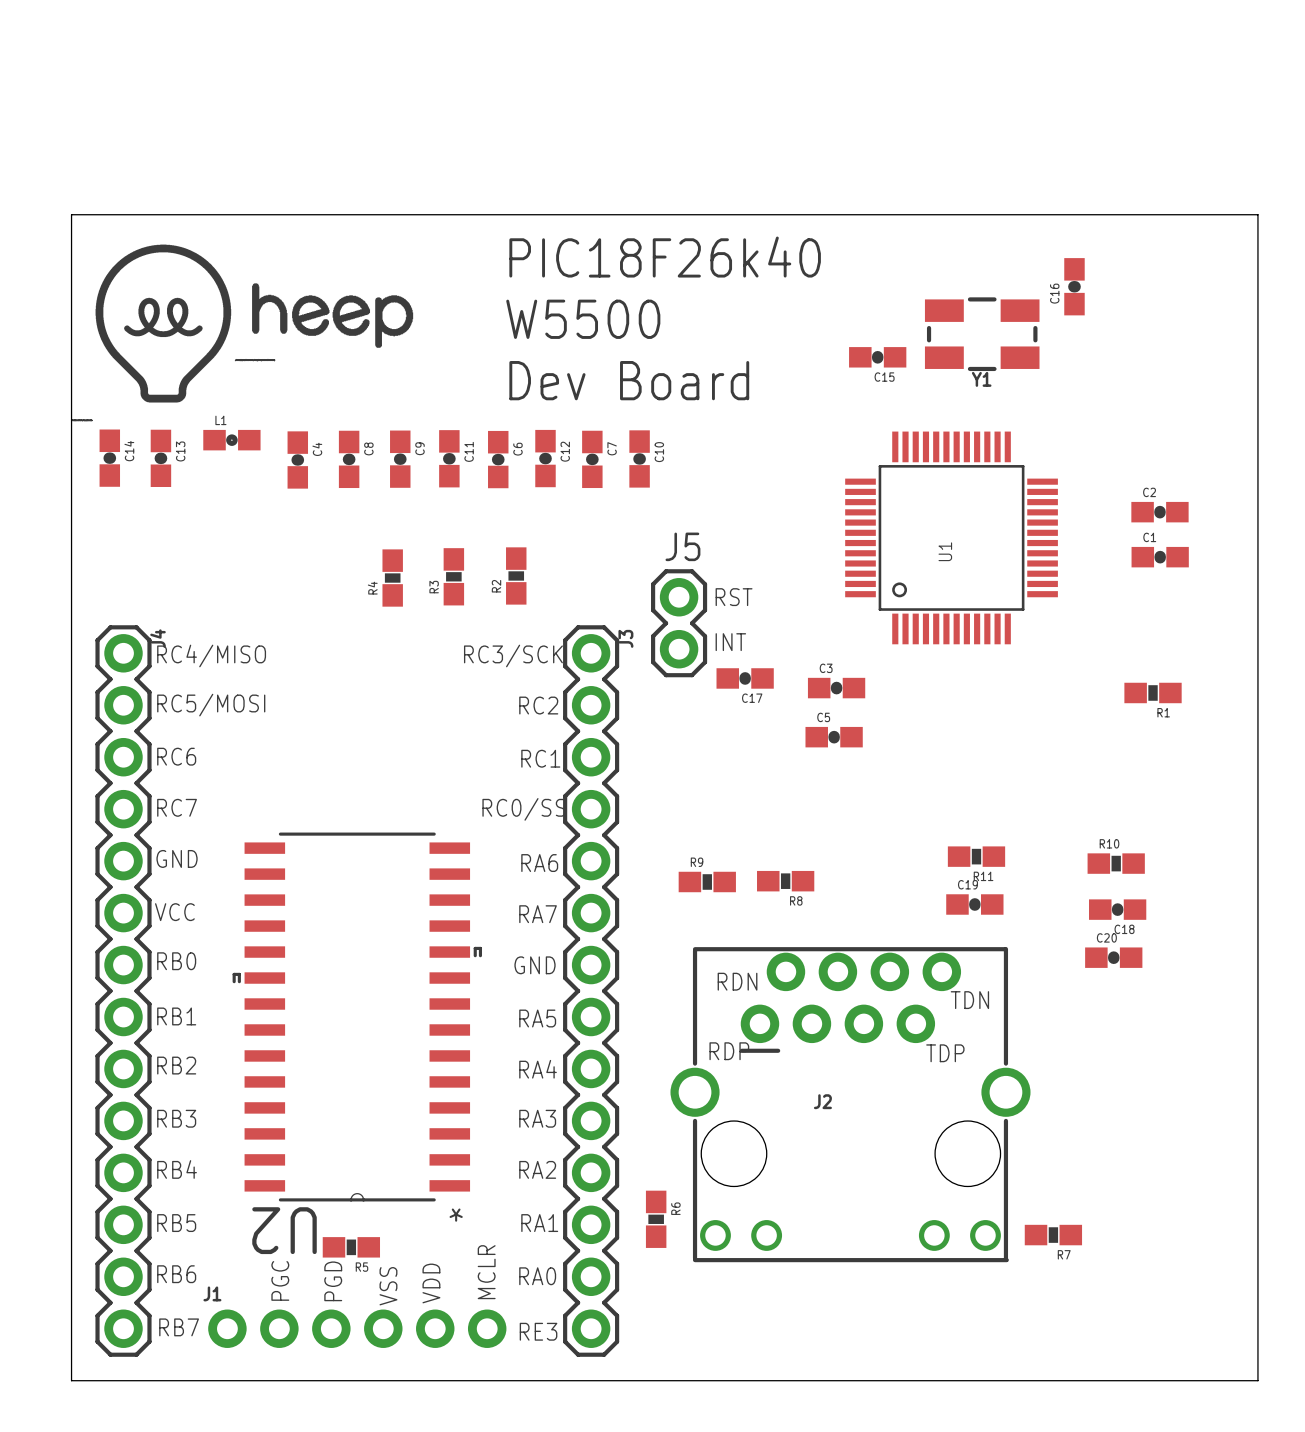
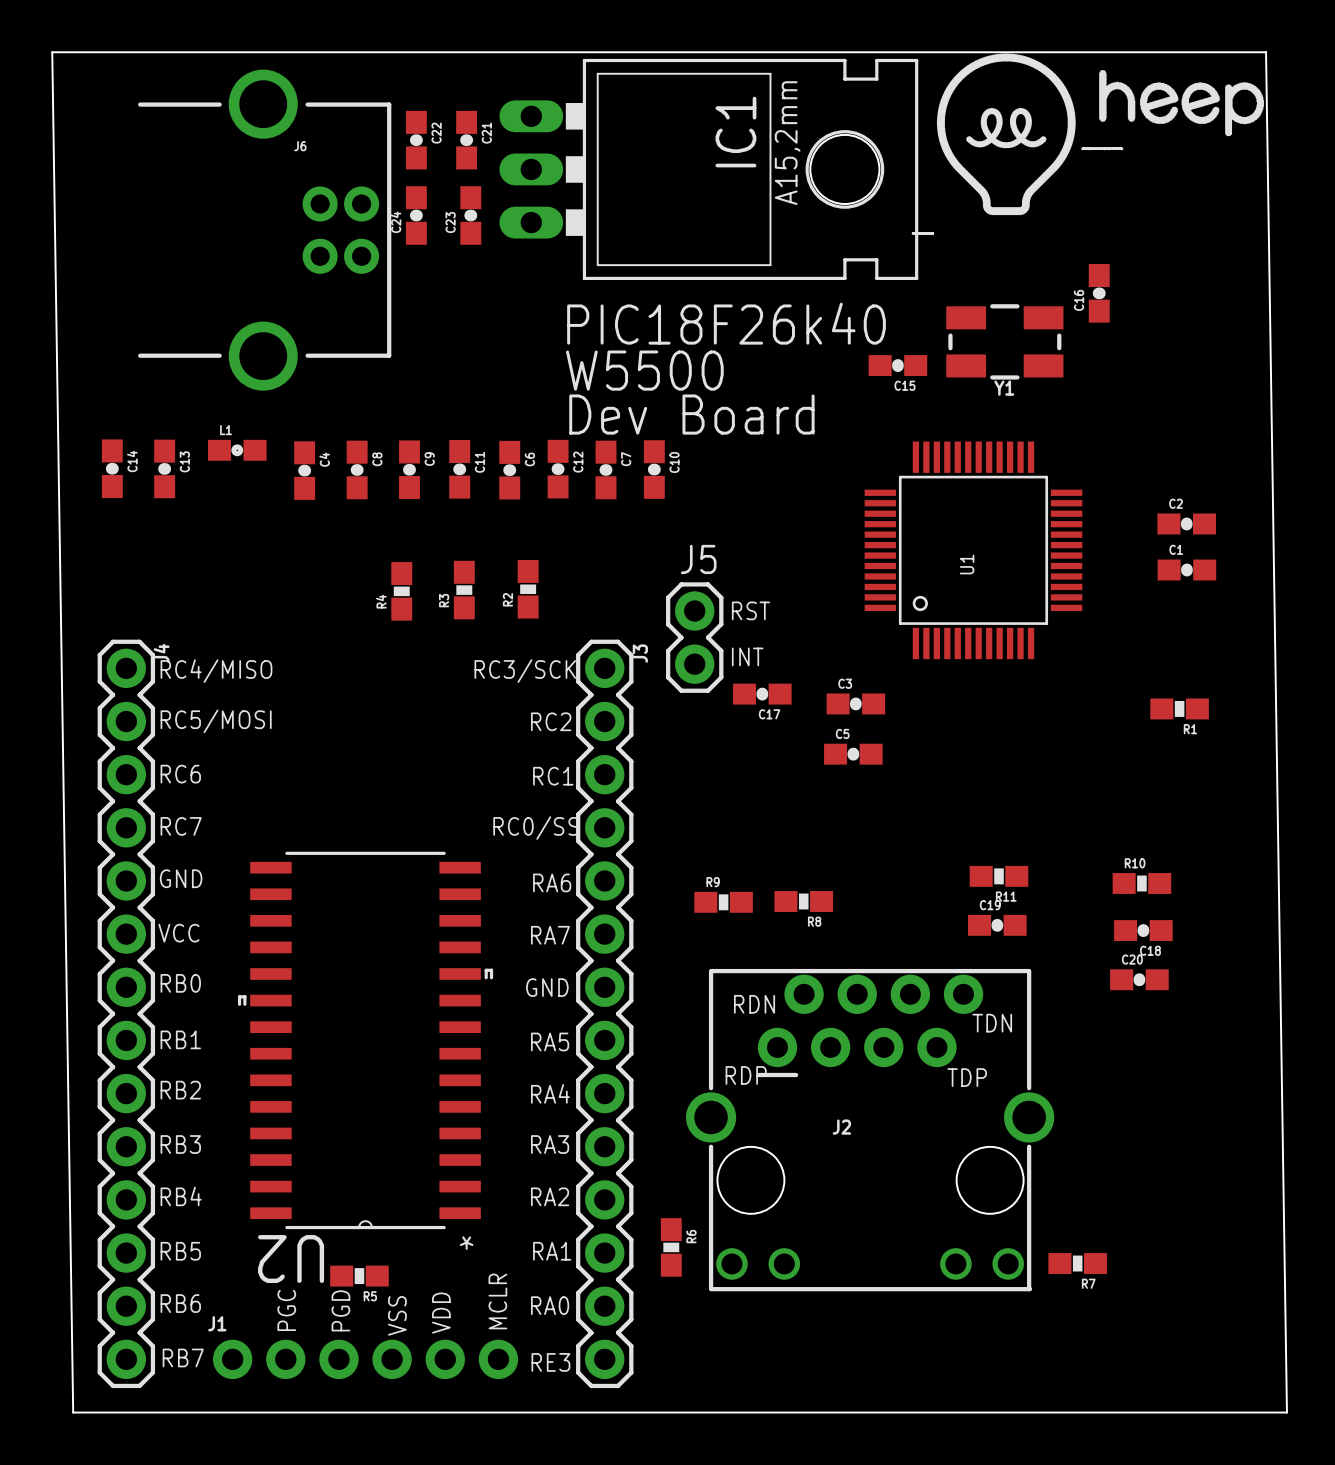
drawing: none -> [936, 53, 1264, 216]
C22: none -> (416, 140)
C21: none -> (466, 140)
IC1: none -> (708, 169)
C24: none -> (416, 215)
C23: none -> (470, 215)
J6: none -> (264, 230)
drawing: [95, 244, 414, 403] -> none
text position: PIC18F26k40 (665, 257) -> PIC18F26k40 (726, 323)
text position: W5500 (583, 319) -> W5500 (644, 370)
text position: Dev Board (629, 380) -> Dev Board (691, 414)
board edge: (71, 1380) (71, 214) (1257, 214) (1257, 1380) -> (73, 1412) (52, 52) (1266, 52) (1286, 1412)

